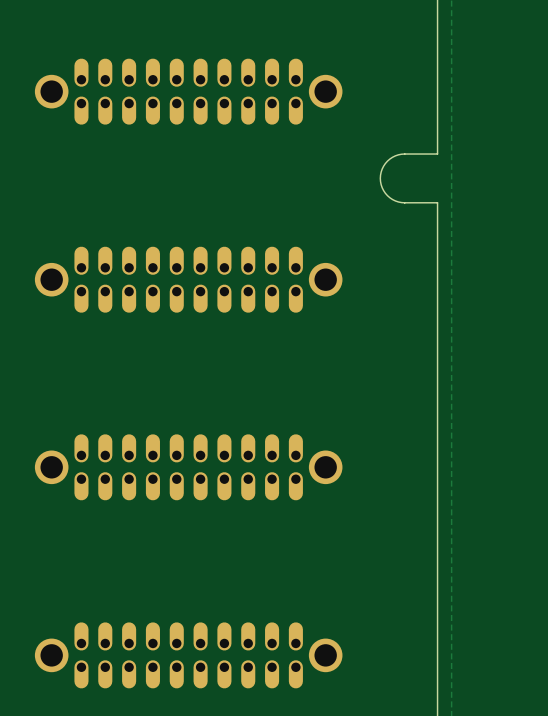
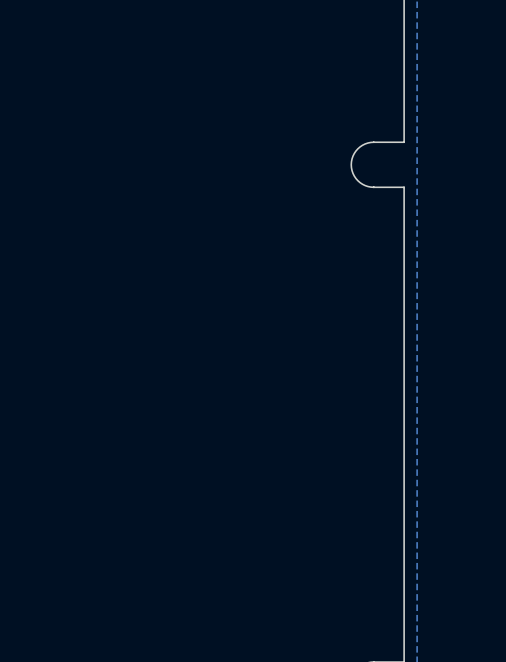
part: (188, 91) -> none
part: (188, 279) -> none
part: (188, 467) -> none
part: (188, 655) -> none

